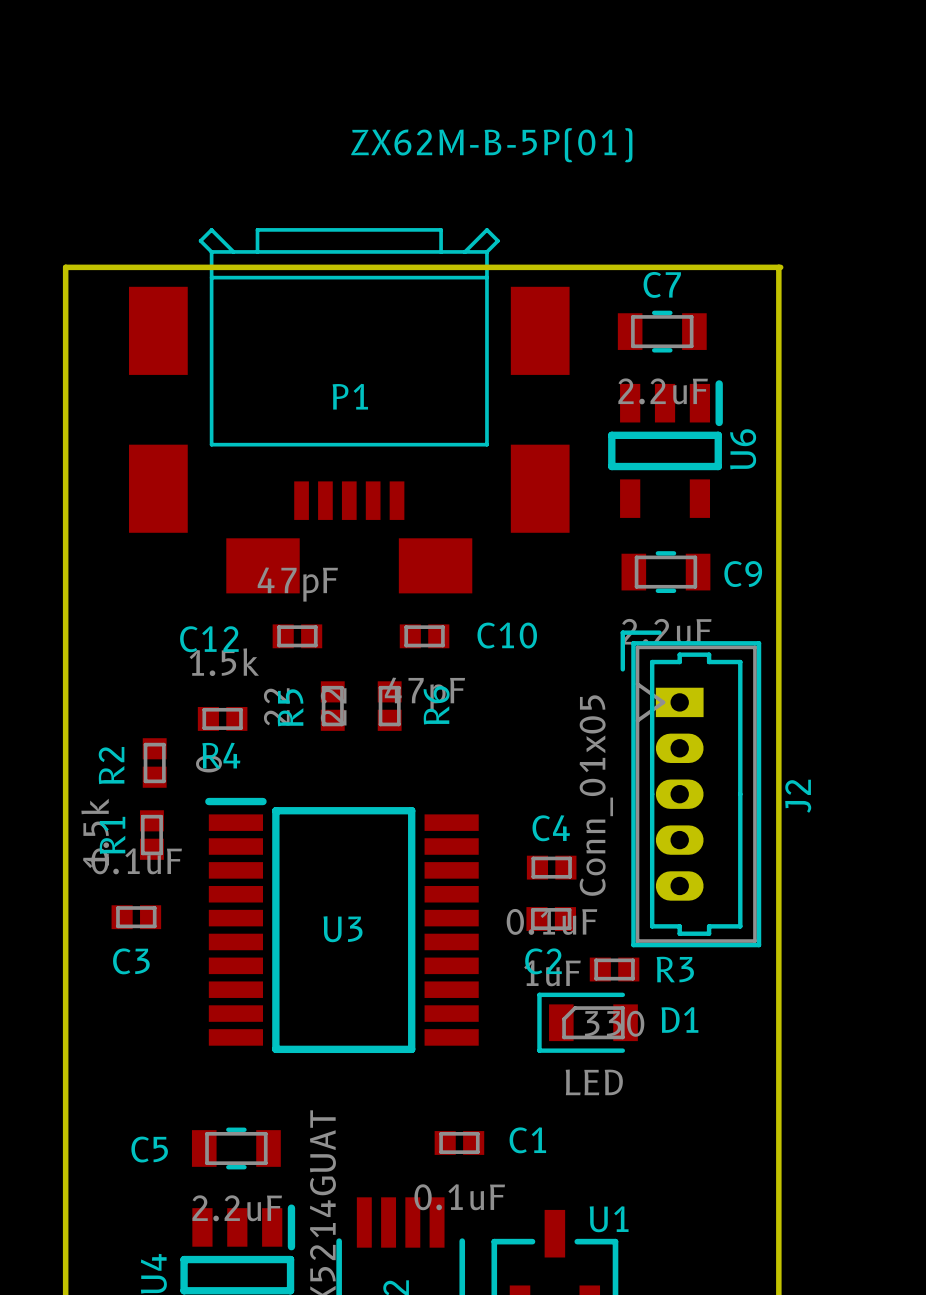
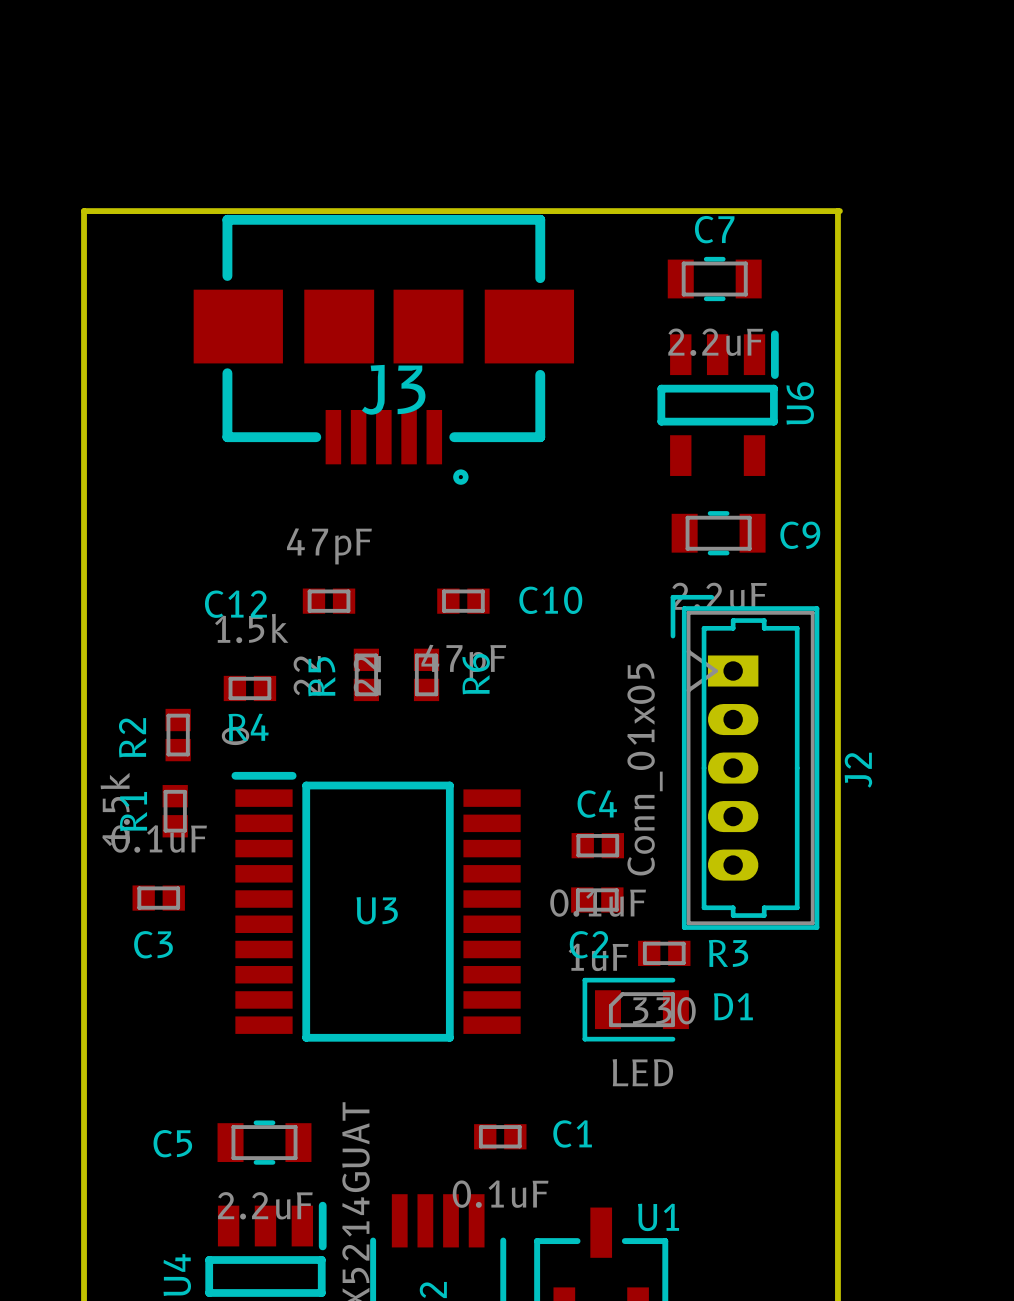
J3: none -> (383, 349)
P1: ZX62M-B-5P(01) (349, 410) -> none

